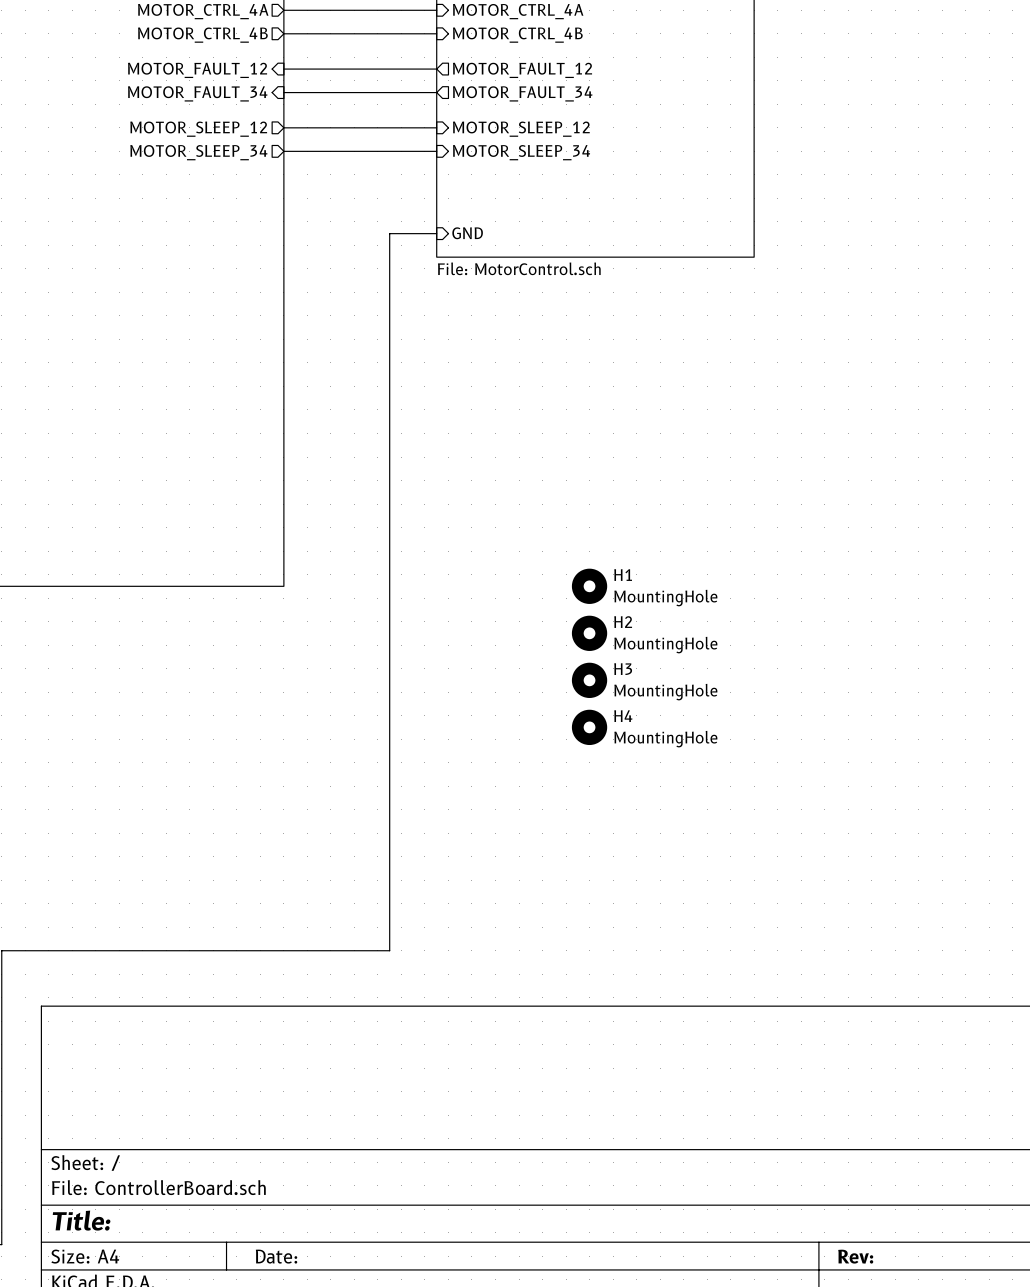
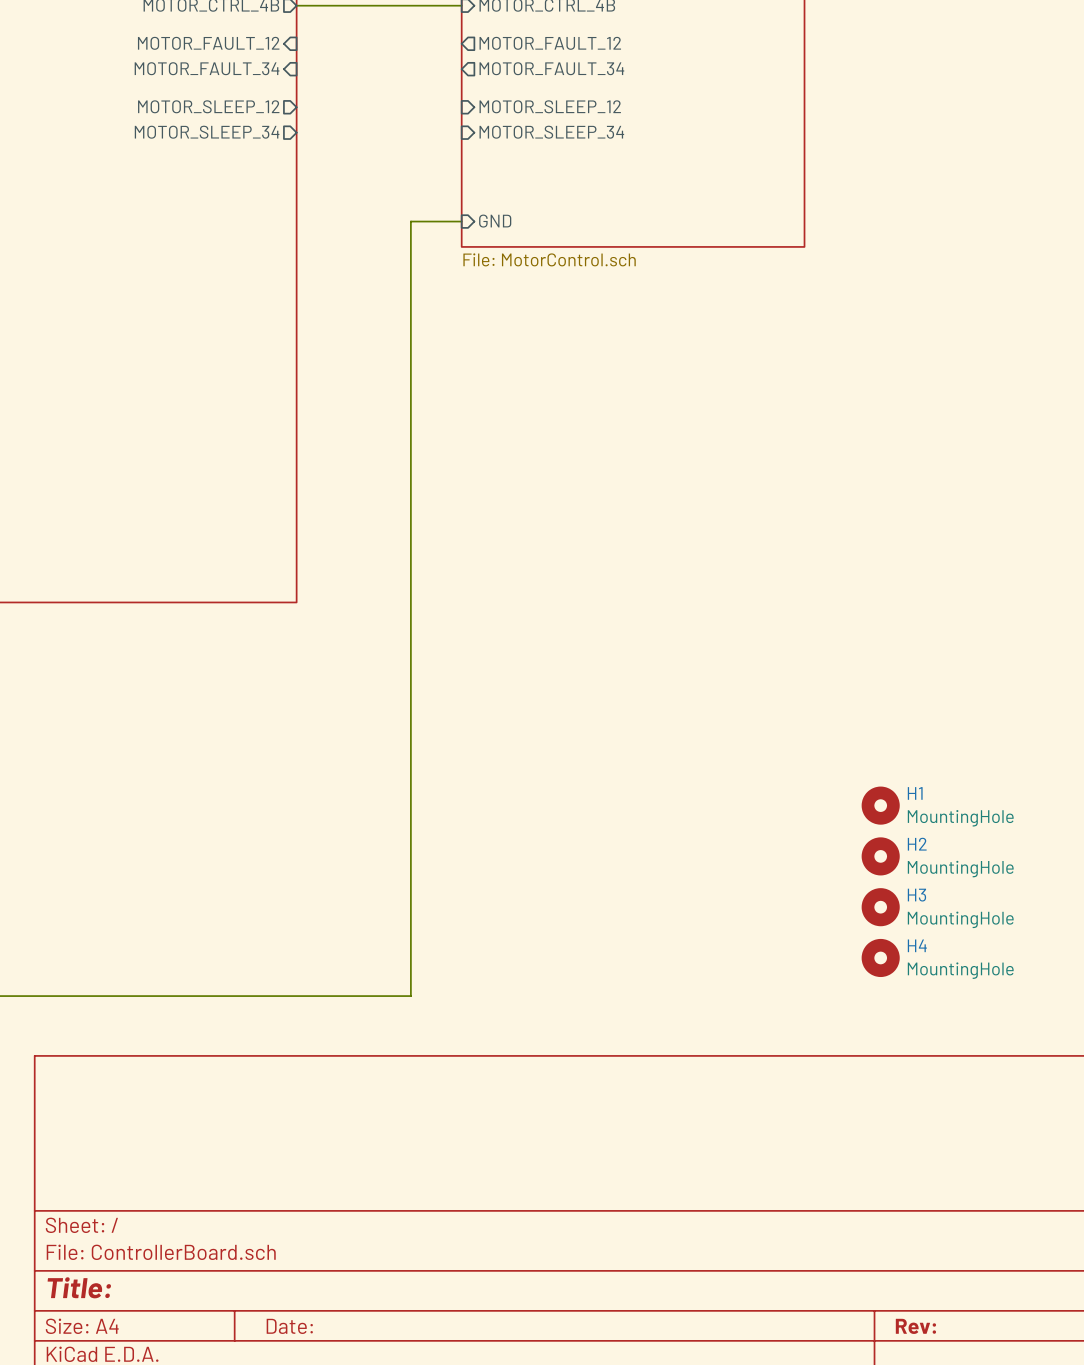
wire: (283, 69) (436, 69) -> none
wire: (283, 92) (436, 92) -> none
wire: (283, 127) (436, 127) -> none
wire: (283, 151) (436, 151) -> none
H1 position: (589, 586) -> (880, 805)
H2 position: (589, 633) -> (880, 856)
H3 position: (589, 680) -> (880, 907)
H4 position: (589, 727) -> (880, 957)

